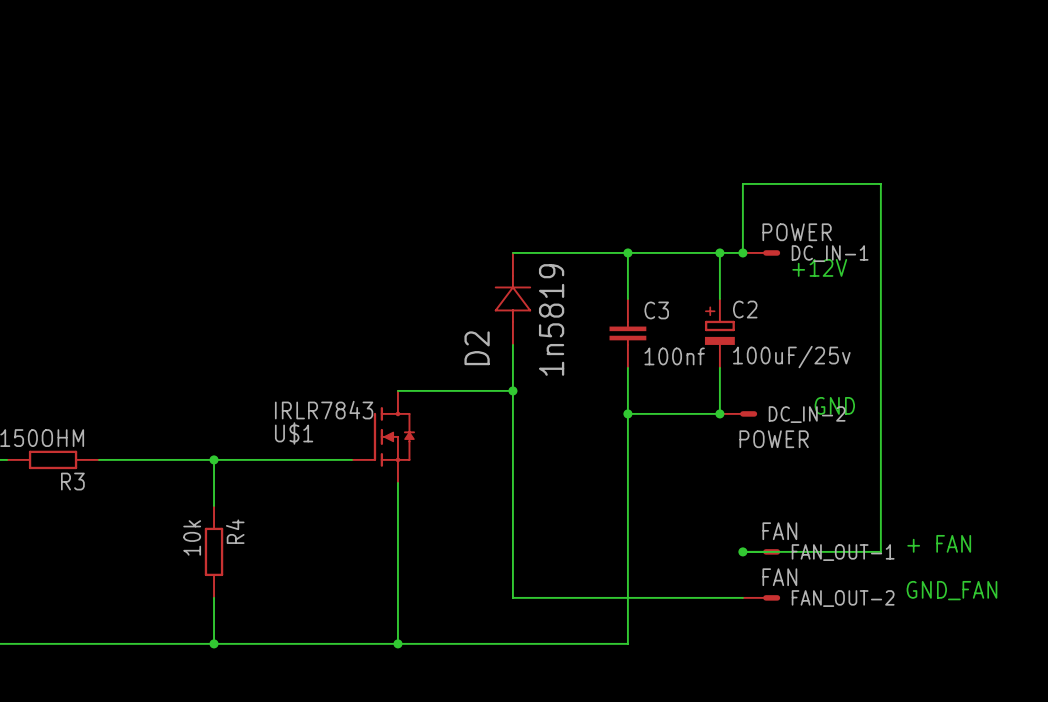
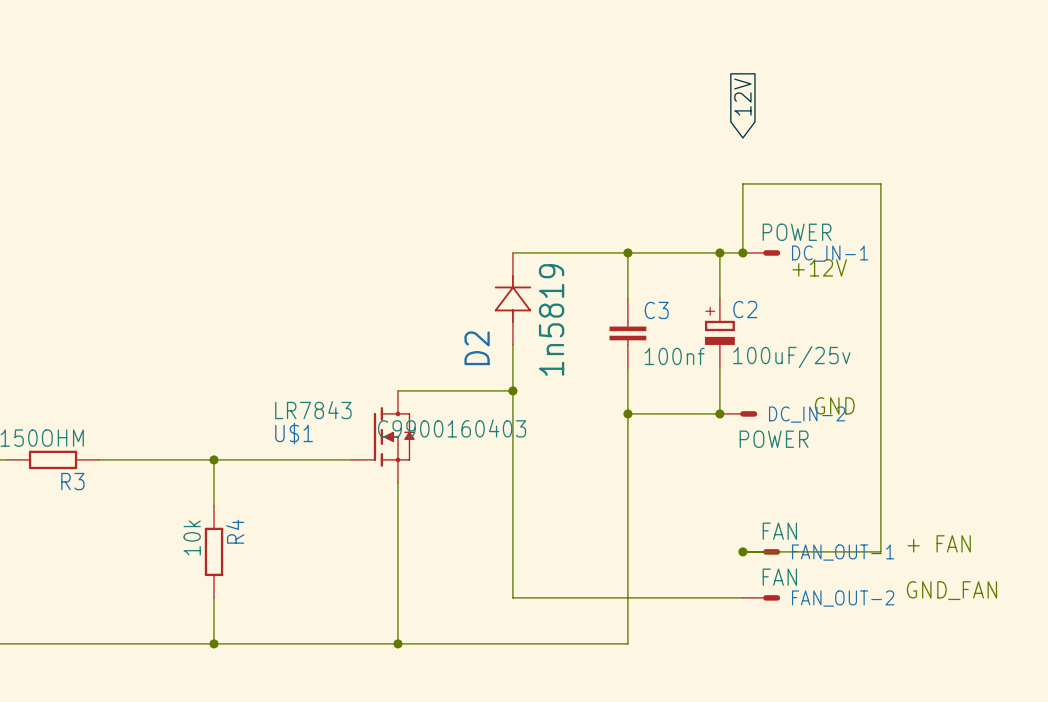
global label: none -> 12V (742, 97)
U$1 value: IRLR7843 (324, 410) -> LR7843 (313, 410)
U$1 text: none -> C9900160403 (452, 428)

